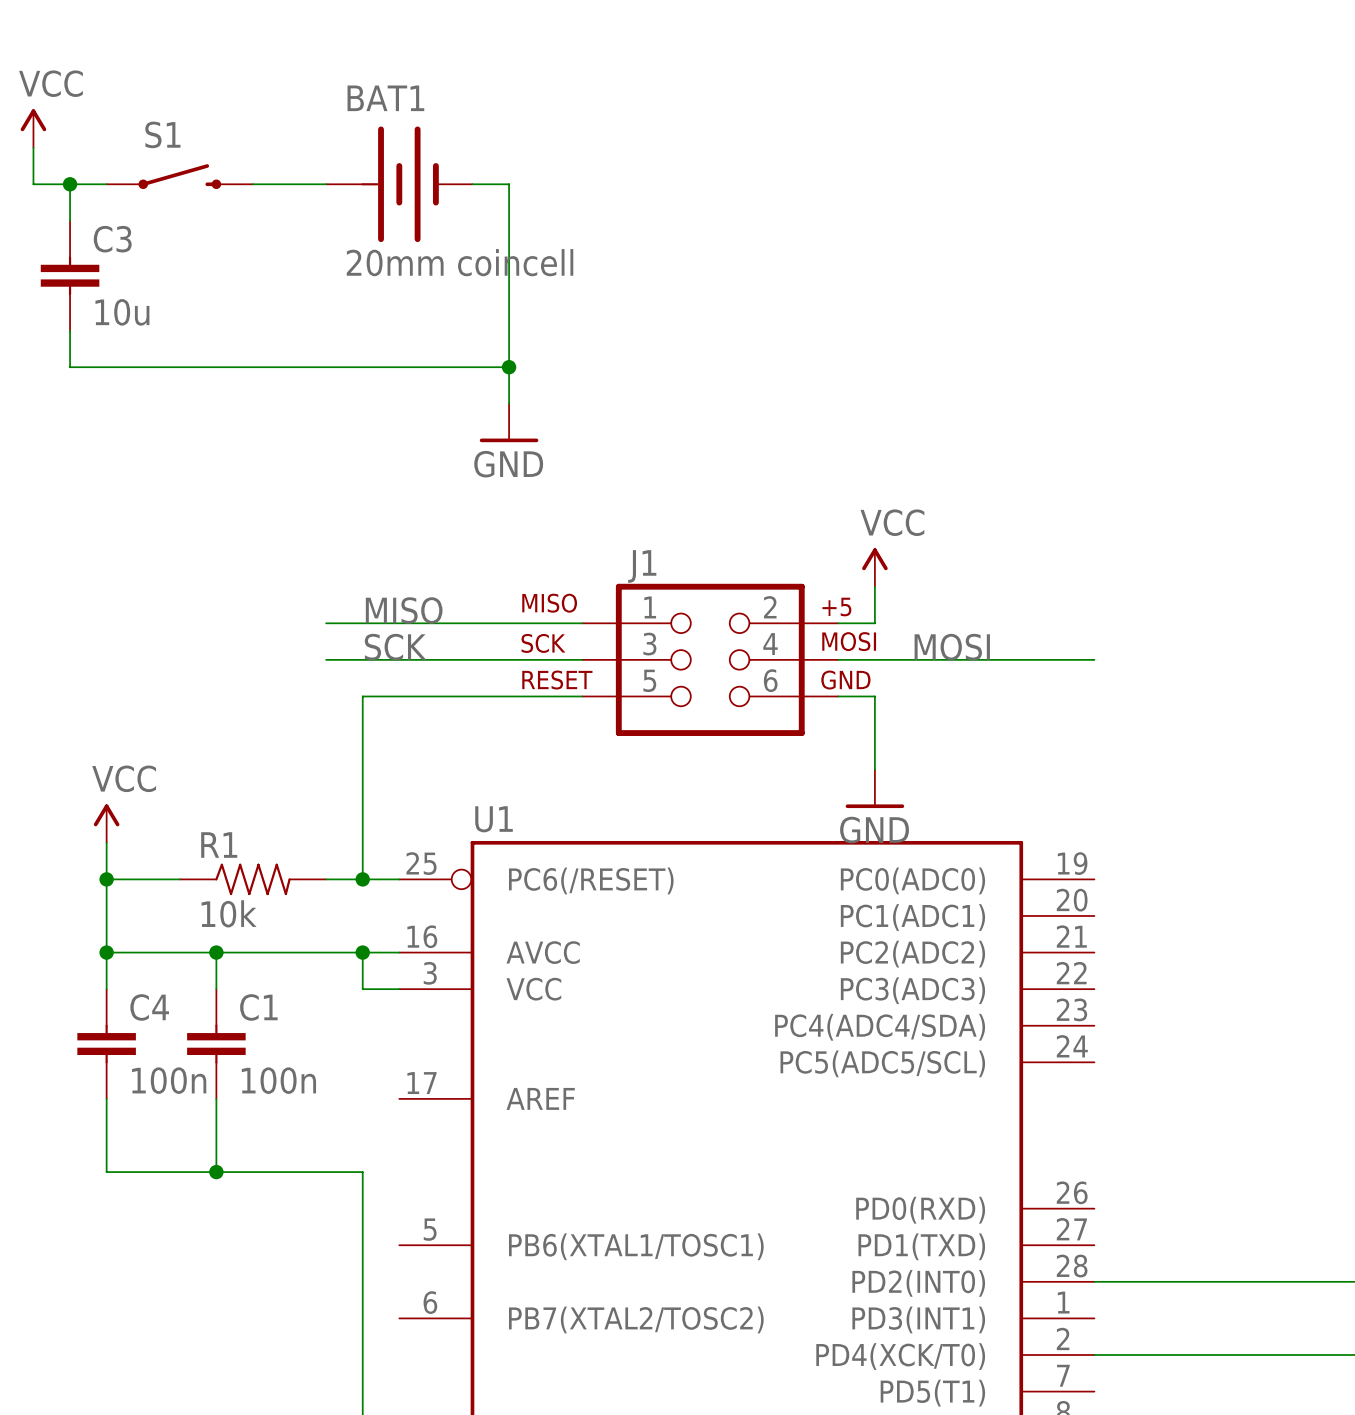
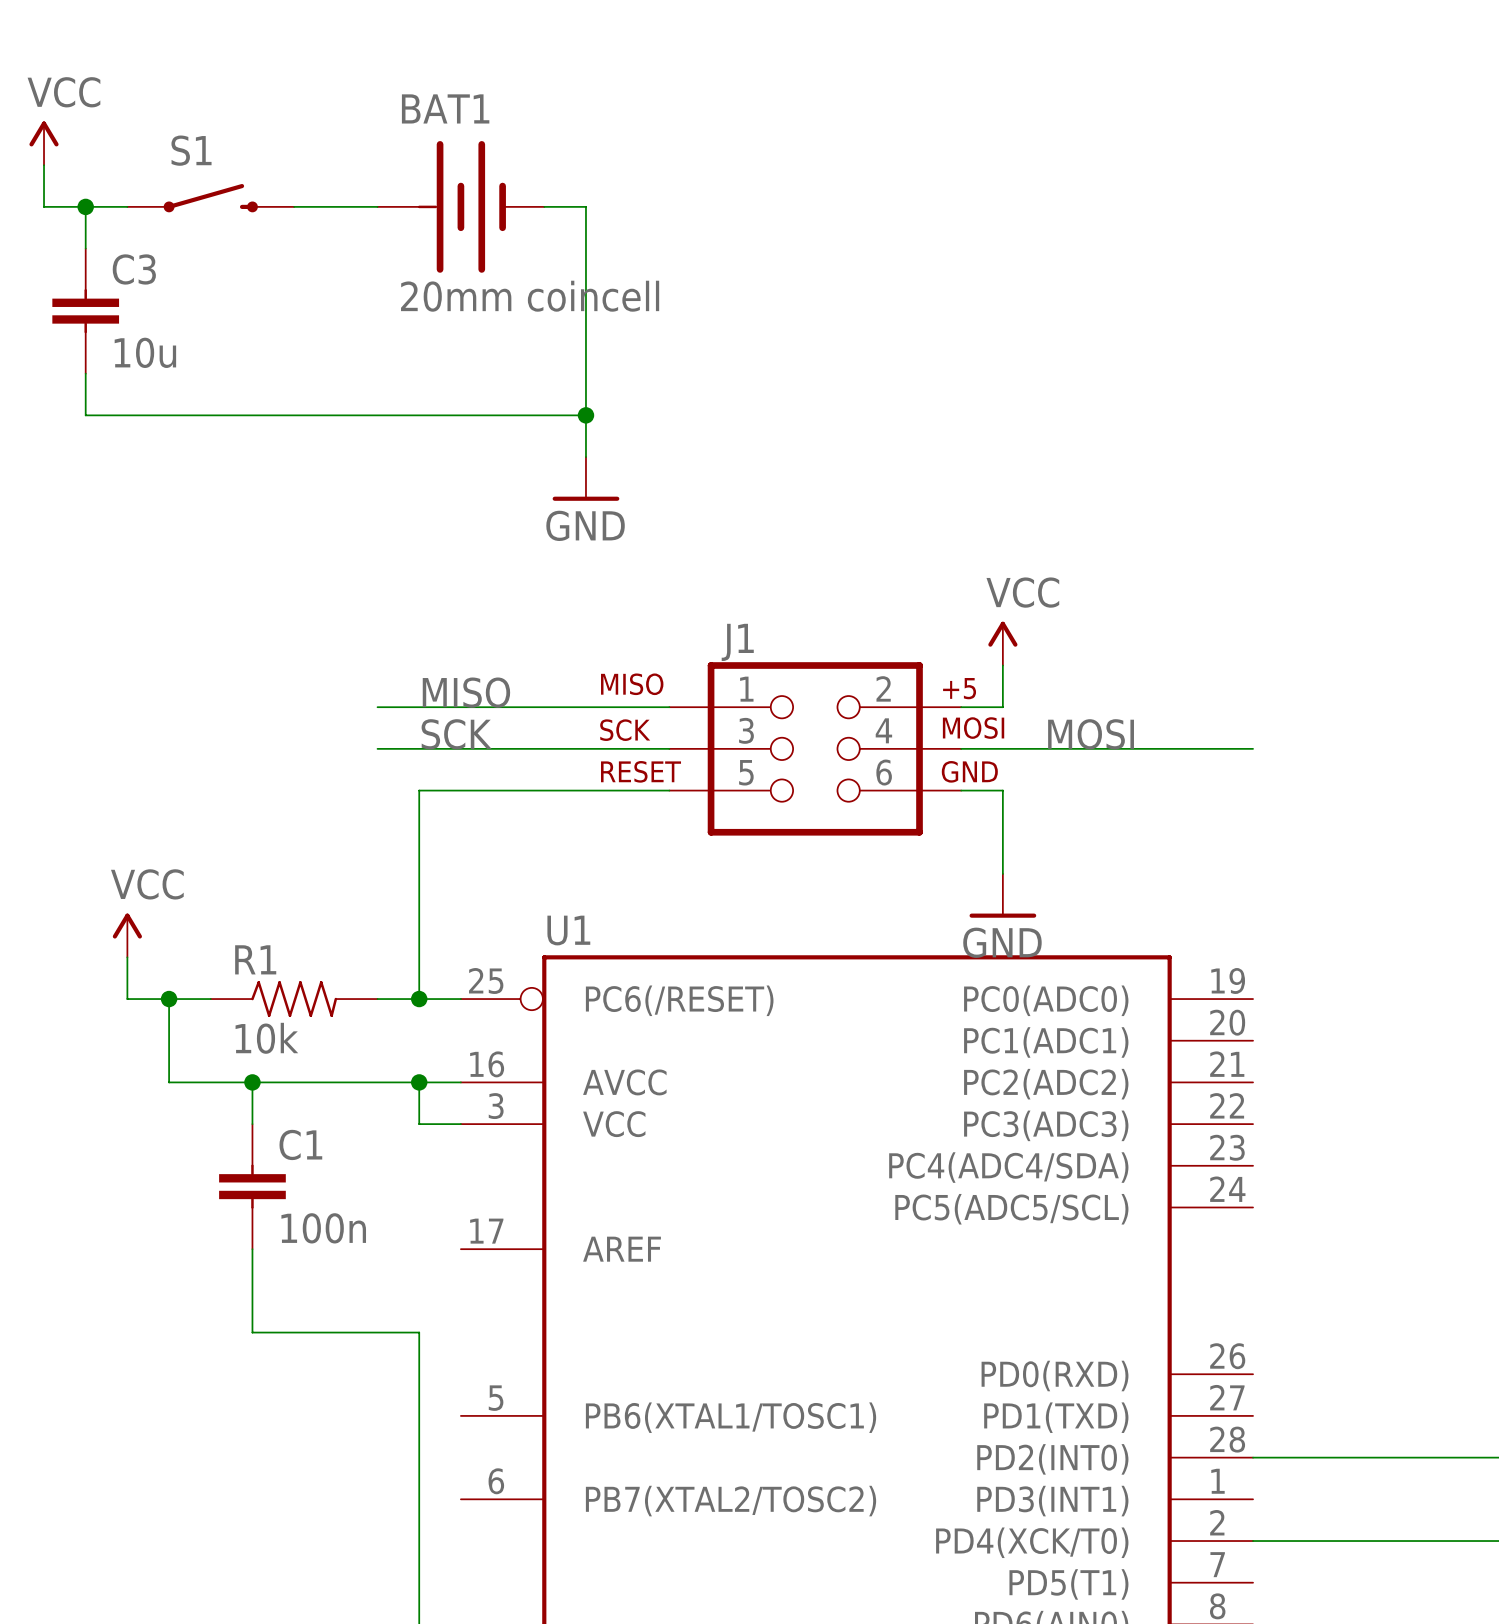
wire: (106, 879) (106, 989) -> none
junction position: (106, 879) -> (169, 999)
wire: (106, 952) (143, 952) -> (169, 999) (169, 1082)
junction: (106, 952) -> none
C4: 100n (106, 1044) -> none
wire: (106, 1098) (106, 1172) (216, 1172) -> none
junction: (216, 1172) -> none

